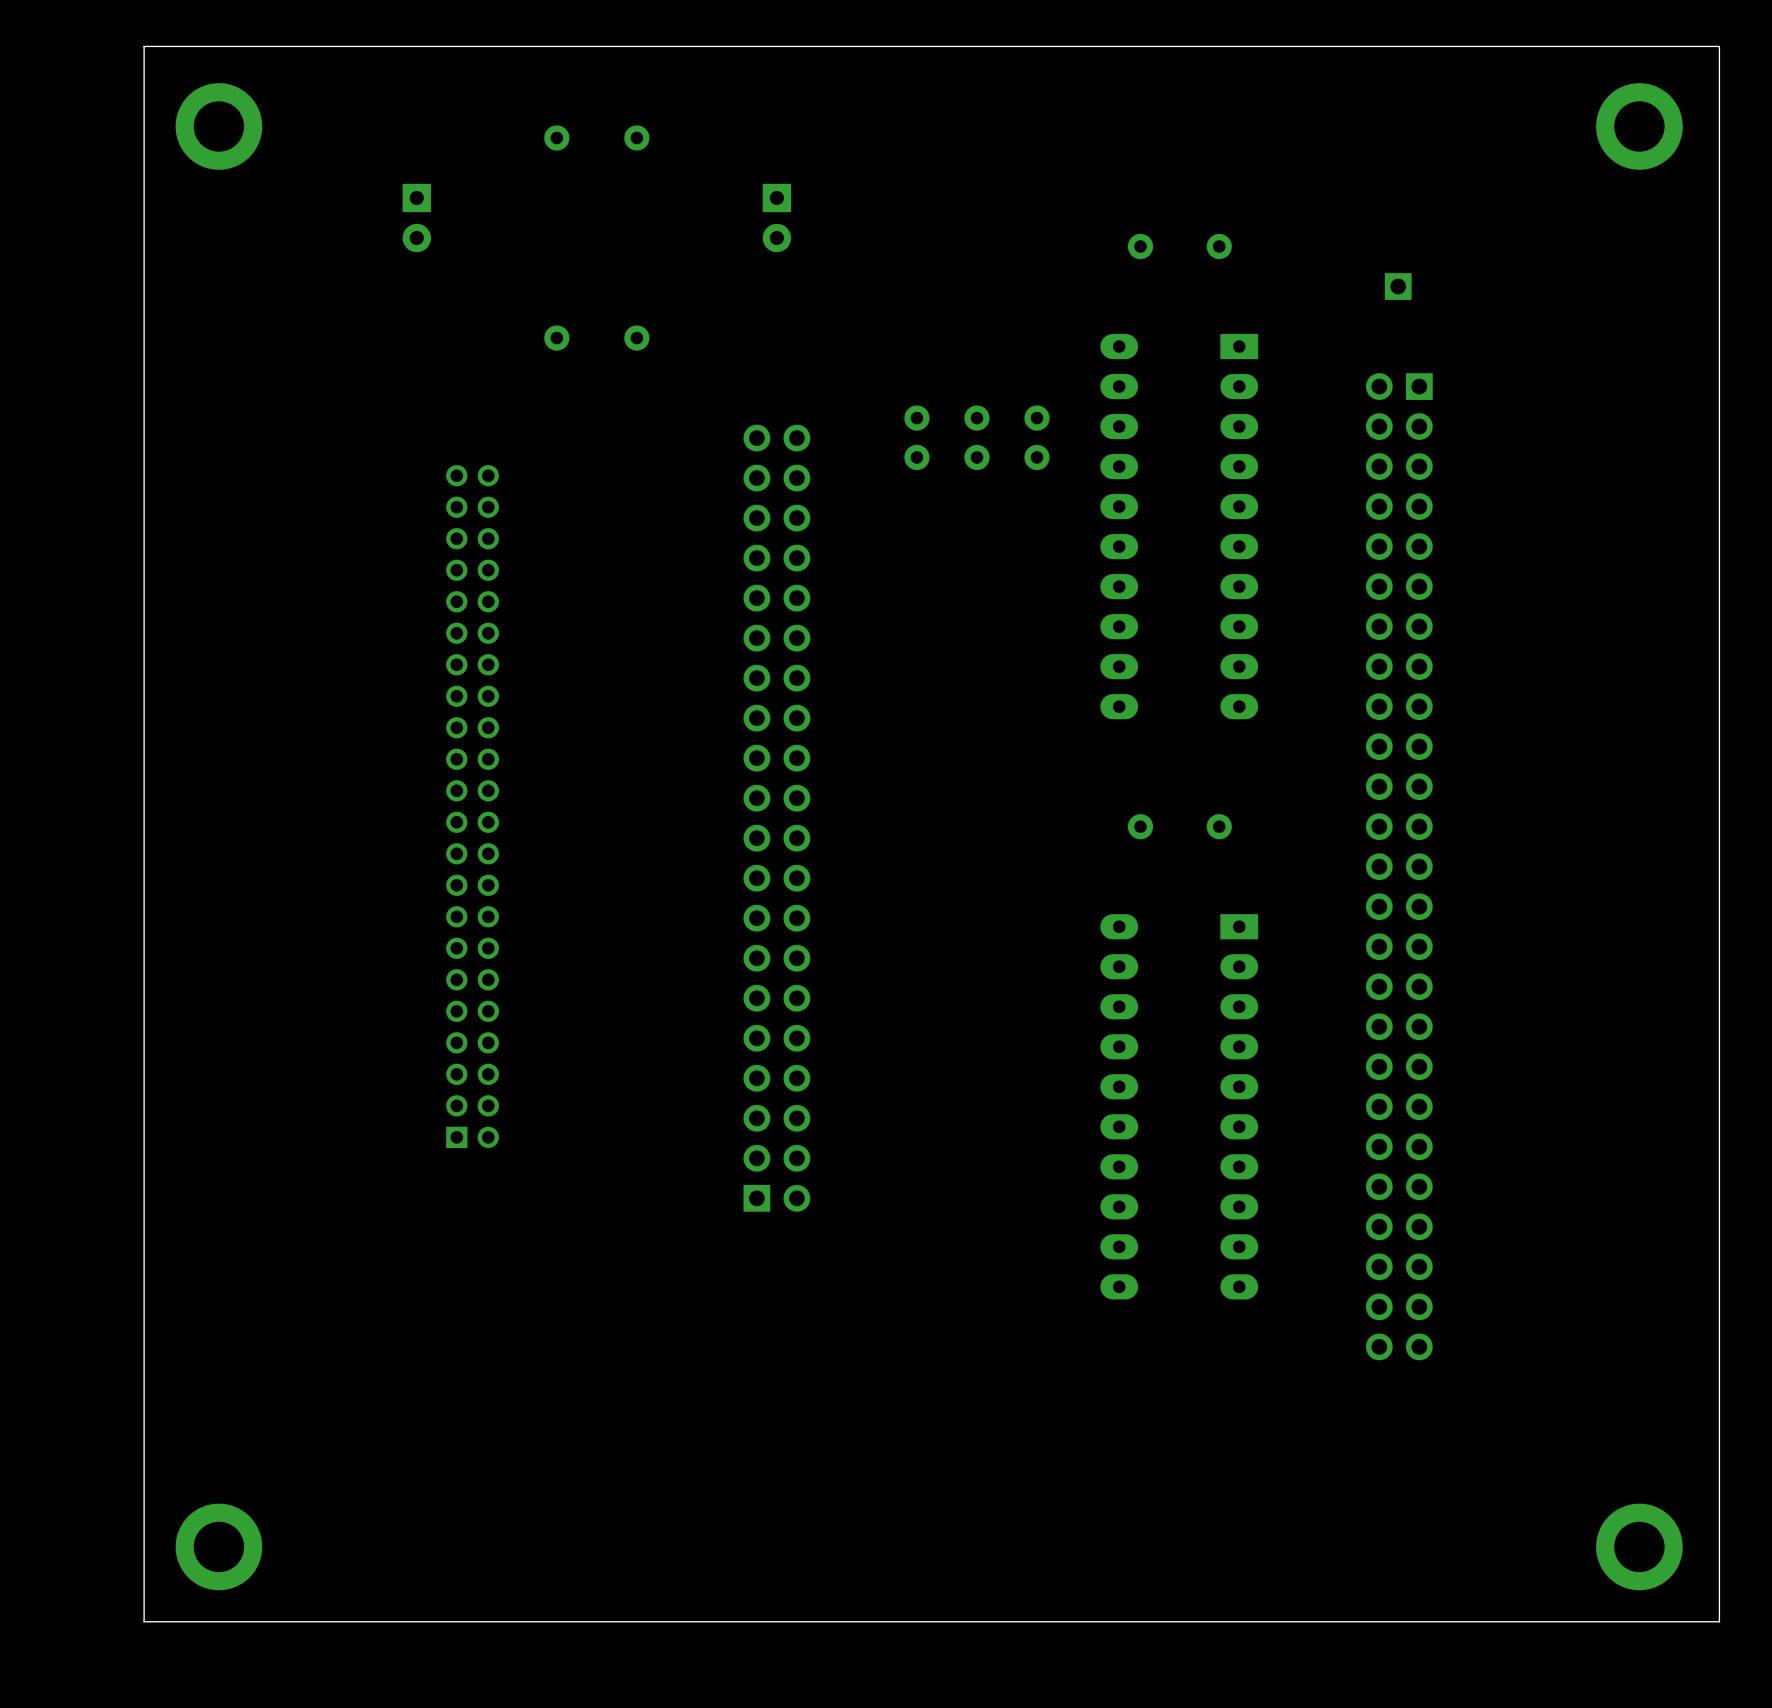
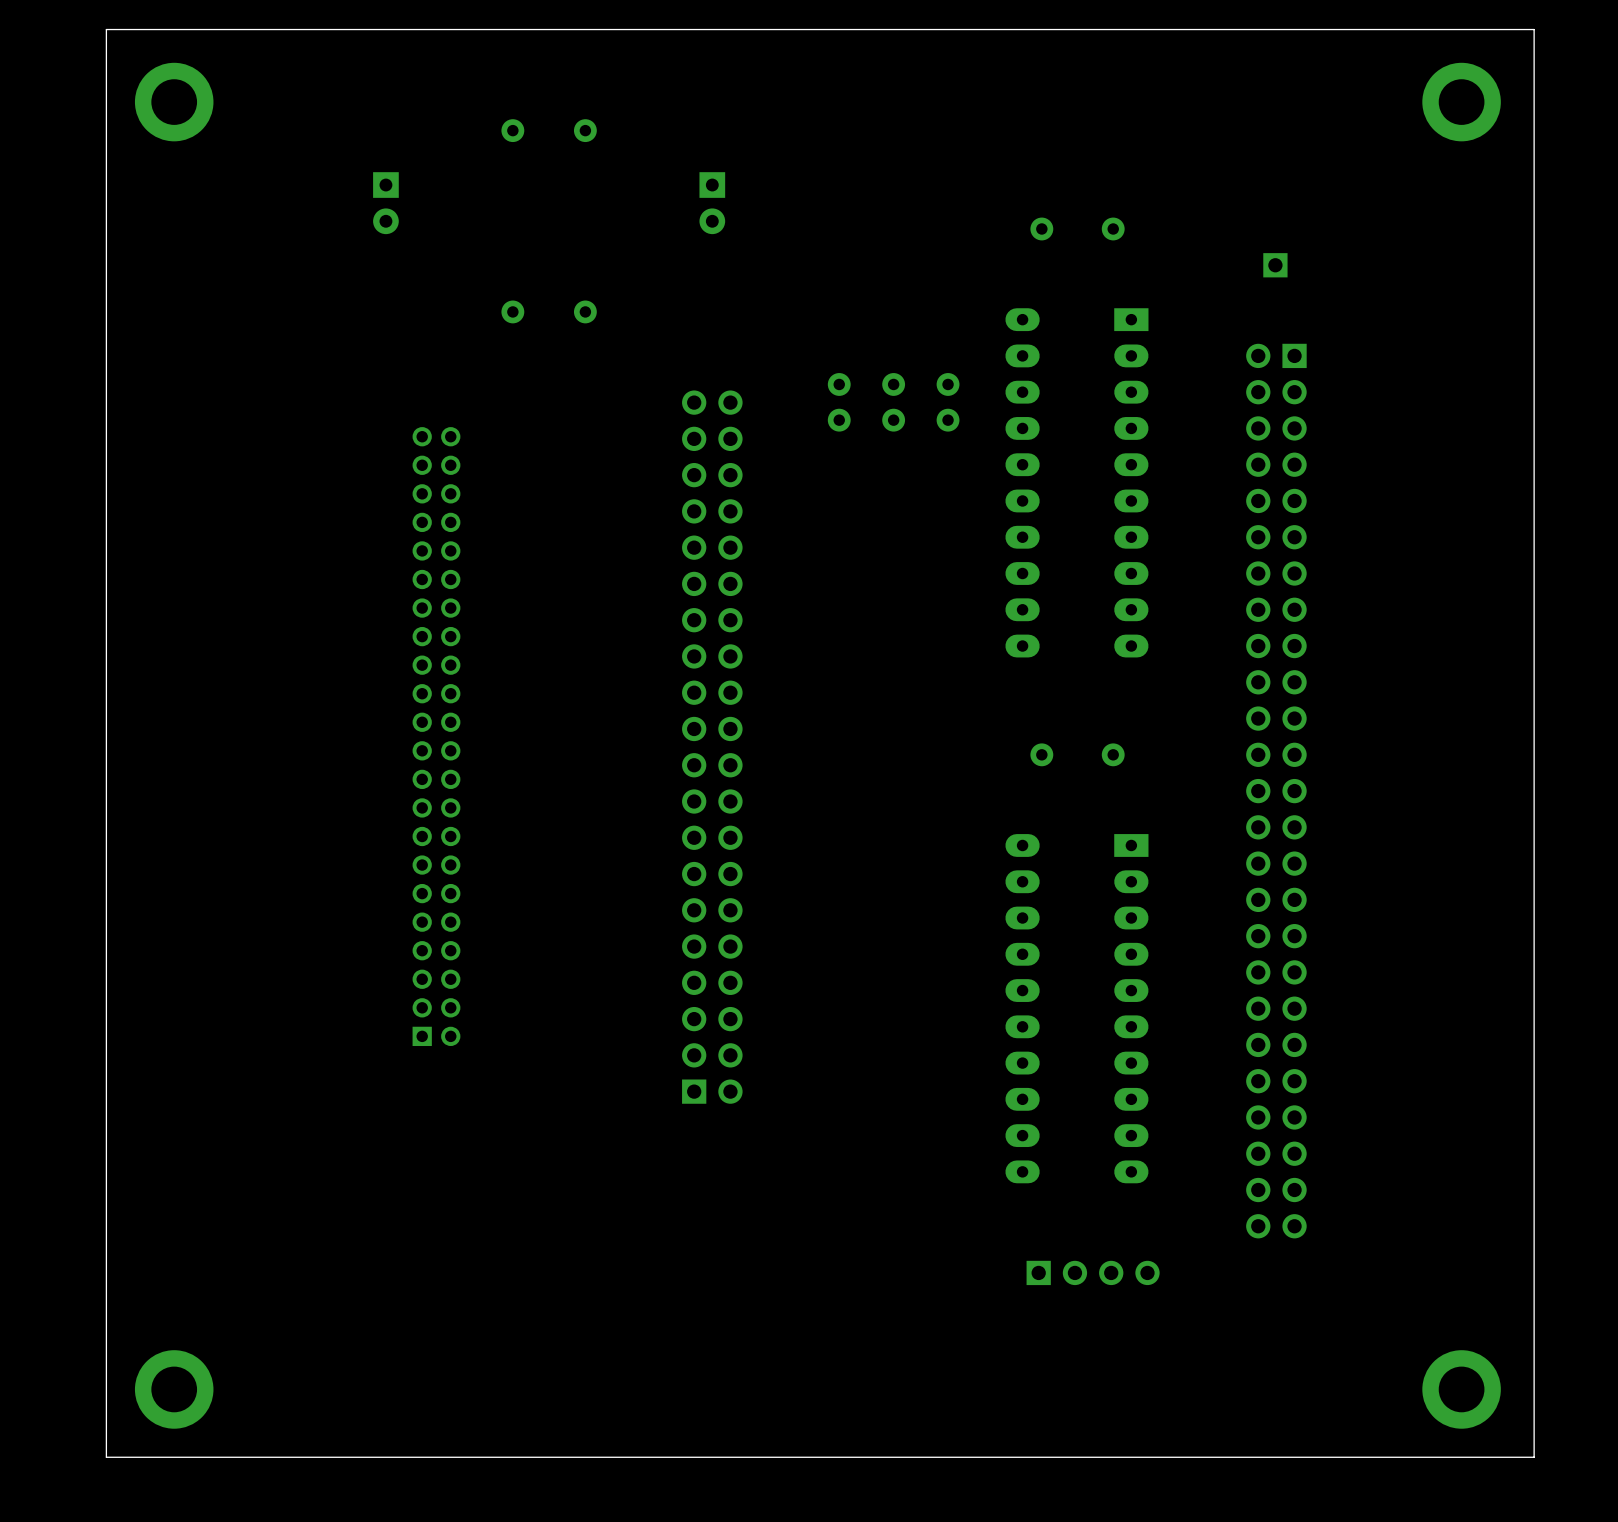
board edge: (1719, 46) (144, 46) (144, 1621) (1719, 1621) (1719, 46) -> (1534, 29) (1534, 1457) (106, 1457) (106, 29) (1534, 29)
part position: (218, 126) -> (174, 102)
part position: (1639, 126) -> (1461, 102)
part: none -> (1093, 1272)
part position: (218, 1546) -> (174, 1389)
part position: (1639, 1546) -> (1461, 1389)

